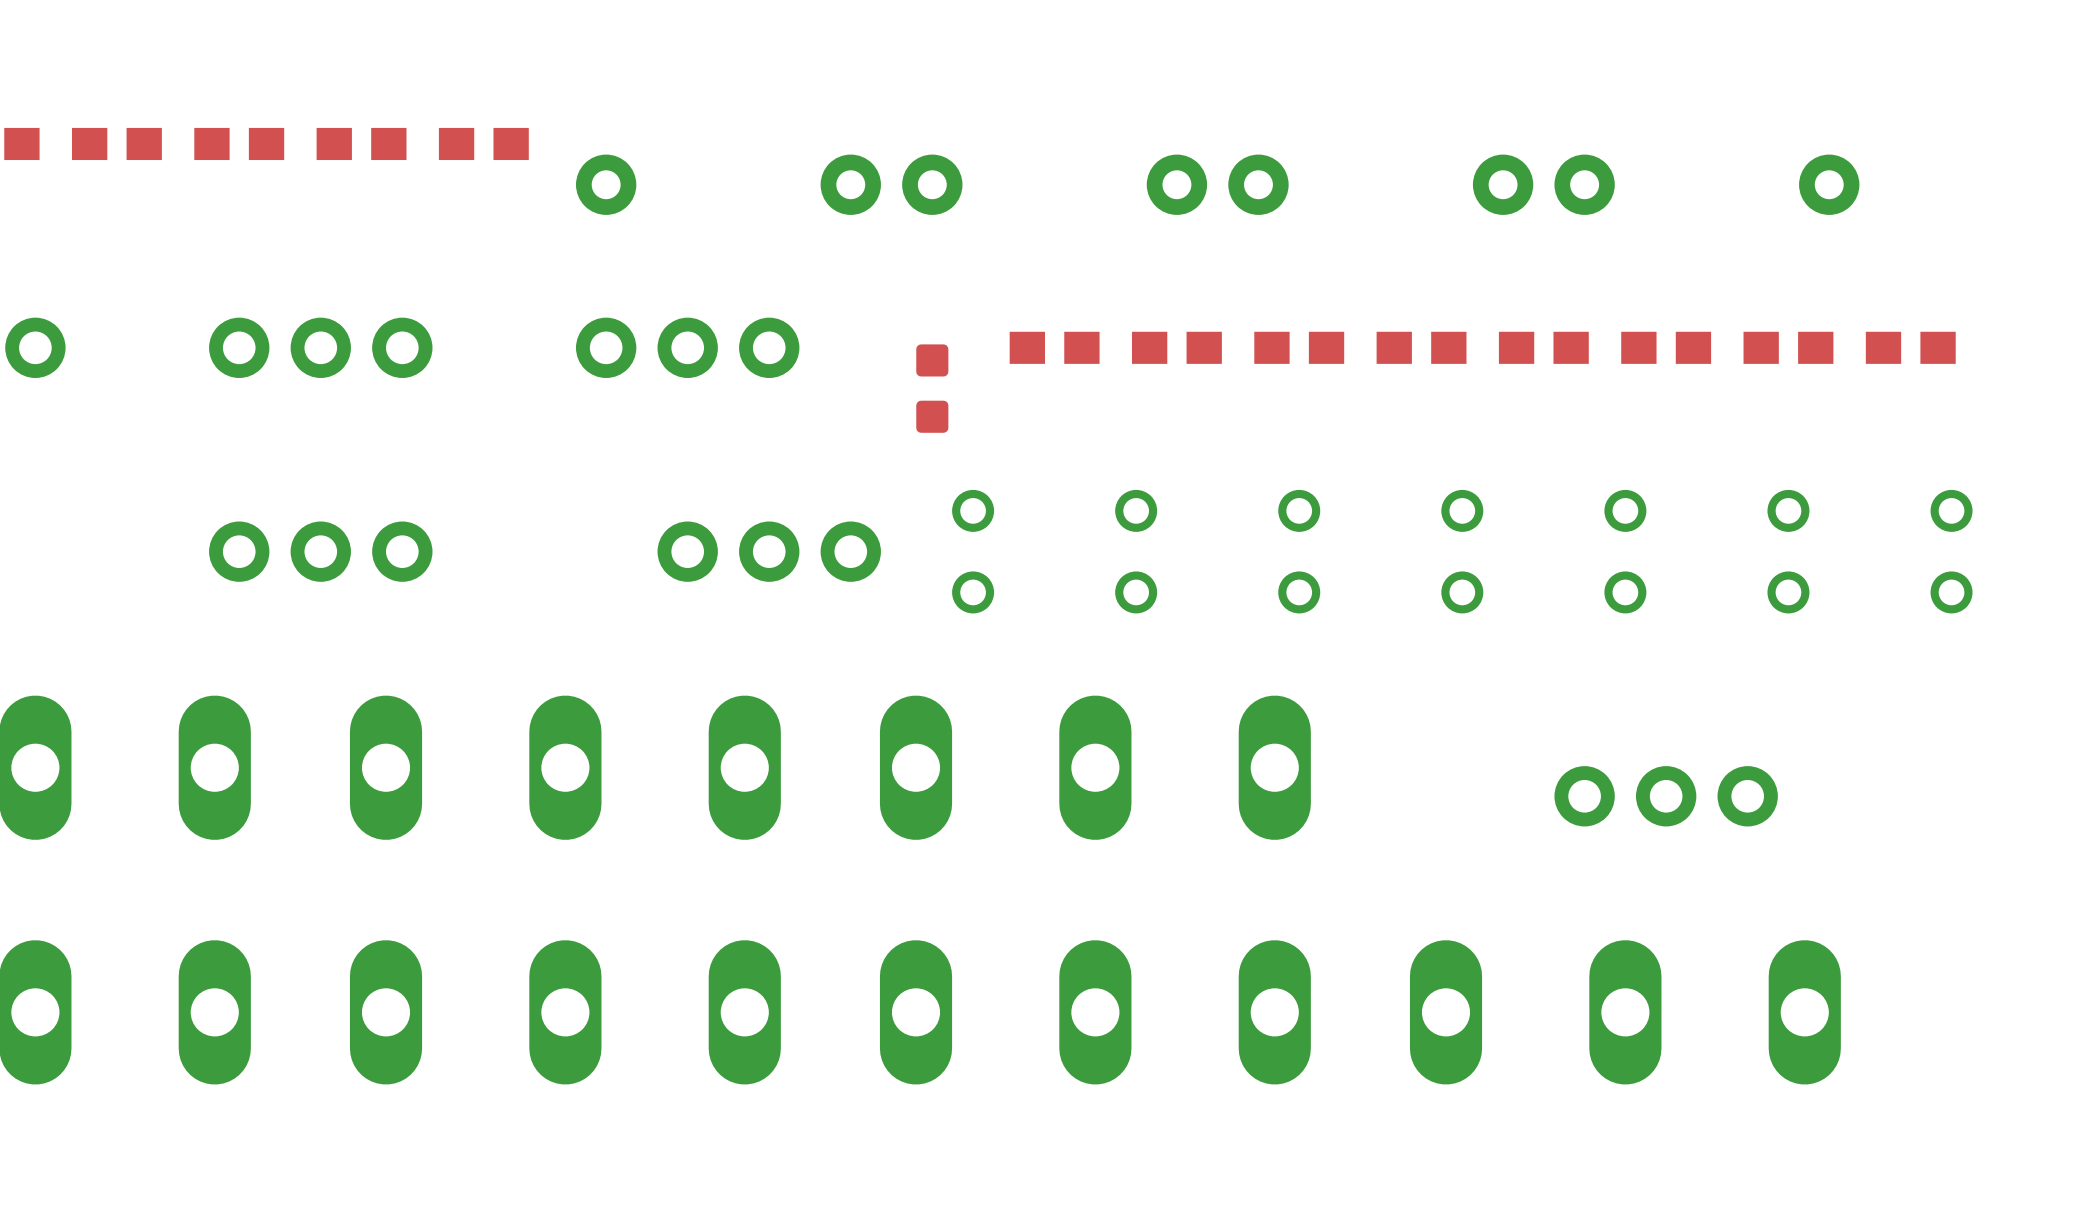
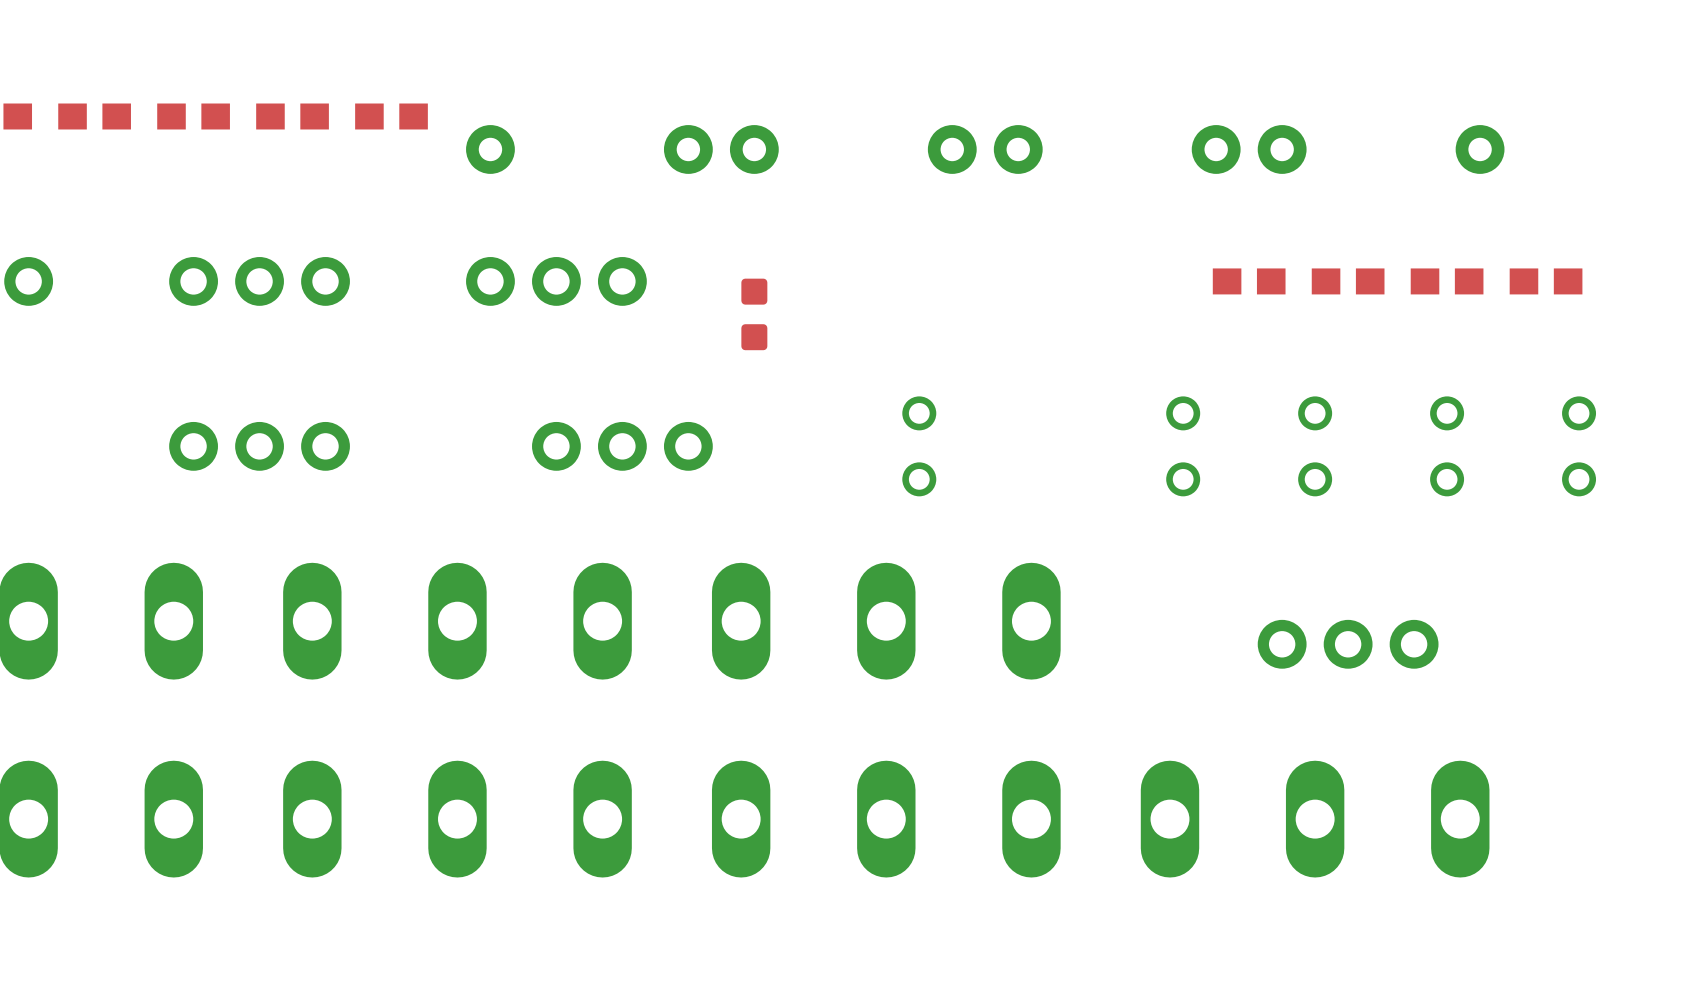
part: (1054, 347) -> none
part: (1176, 347) -> none
part: (1299, 347) -> none
part: (1421, 347) -> none
part: (973, 551) -> none
part: (1299, 551) -> none

